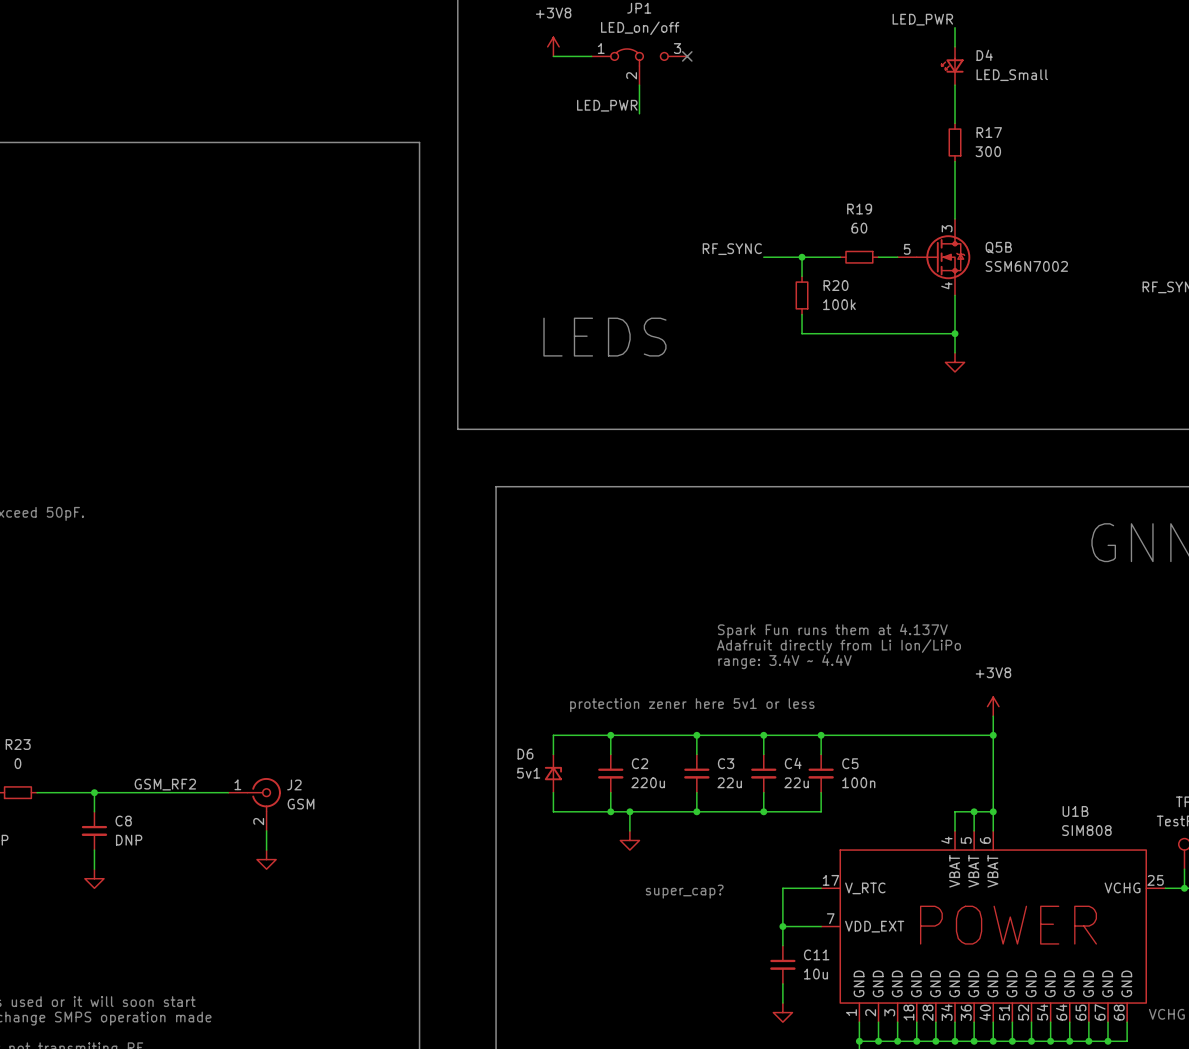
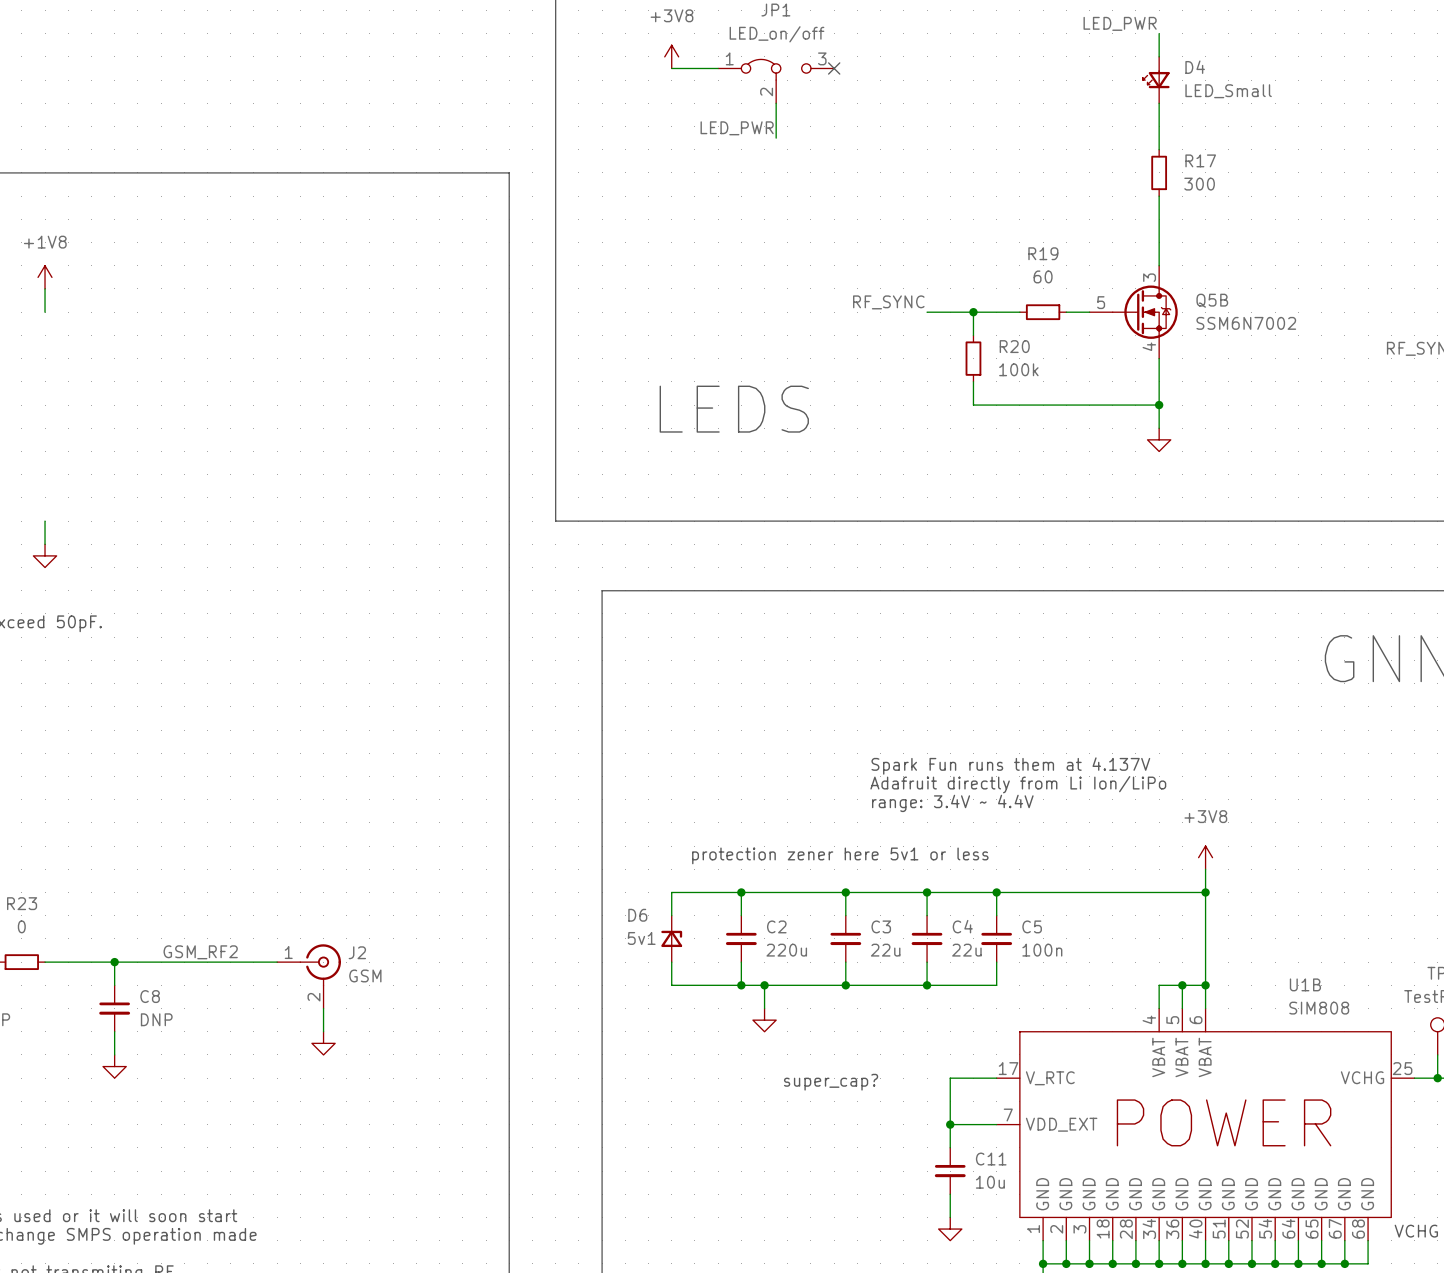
power symbol: none -> +1V8 (45, 277)
wire: none -> (45, 288) (45, 312)
wire: none -> (45, 521) (45, 544)
power symbol: none -> (45, 555)

